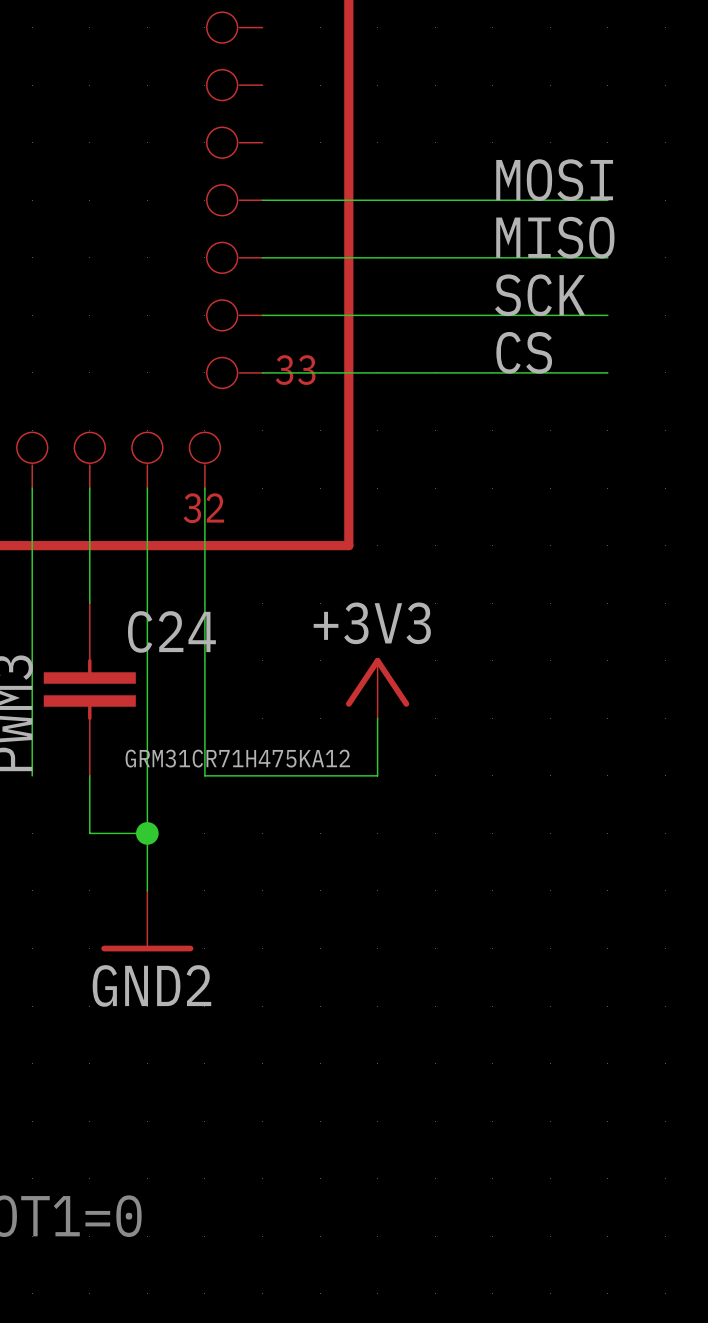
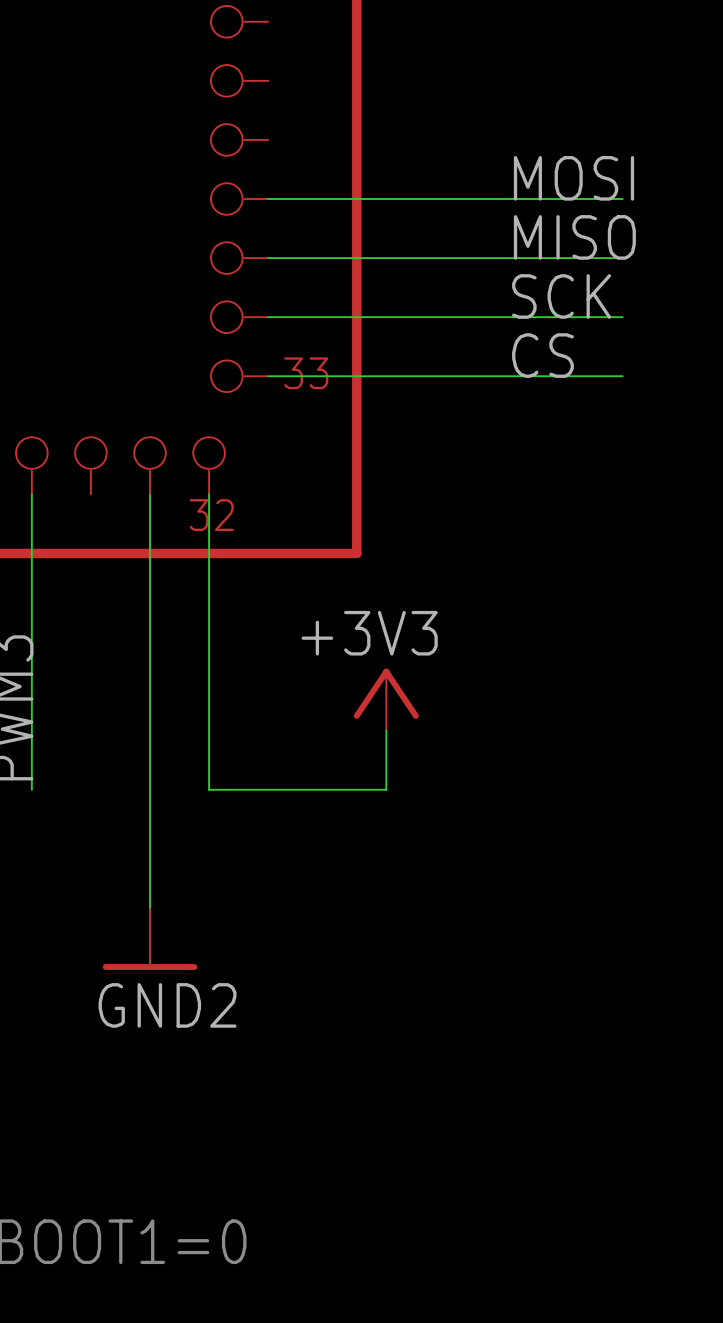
wire: (89, 488) (89, 603) -> none
C24: GRM31CR71H475KA12 (89, 689) -> none
wire: (89, 775) (89, 833) (147, 833) -> none
junction: (147, 833) -> none

